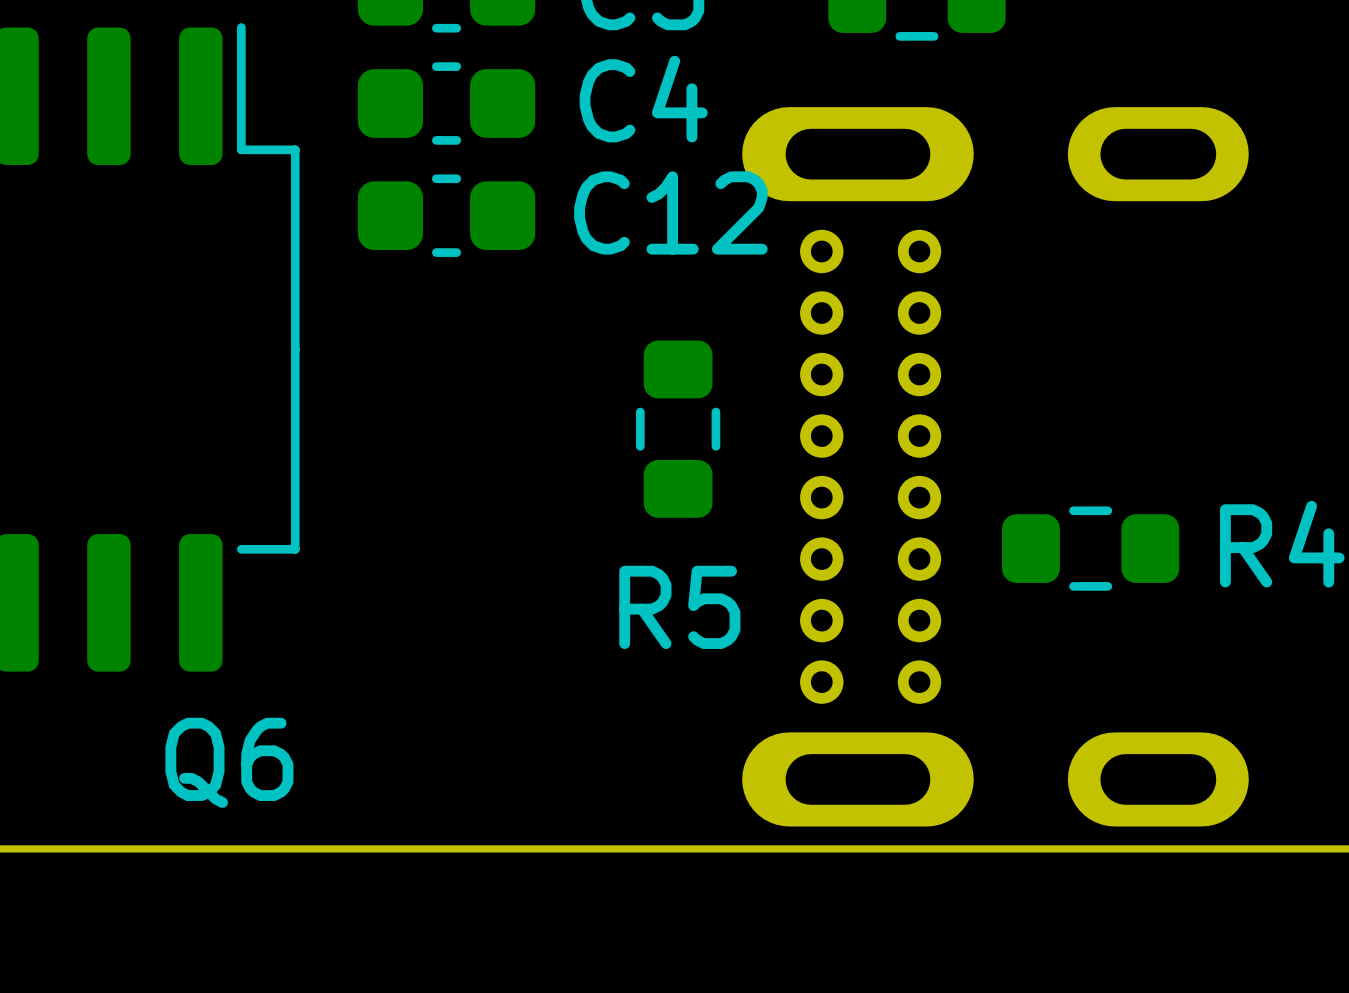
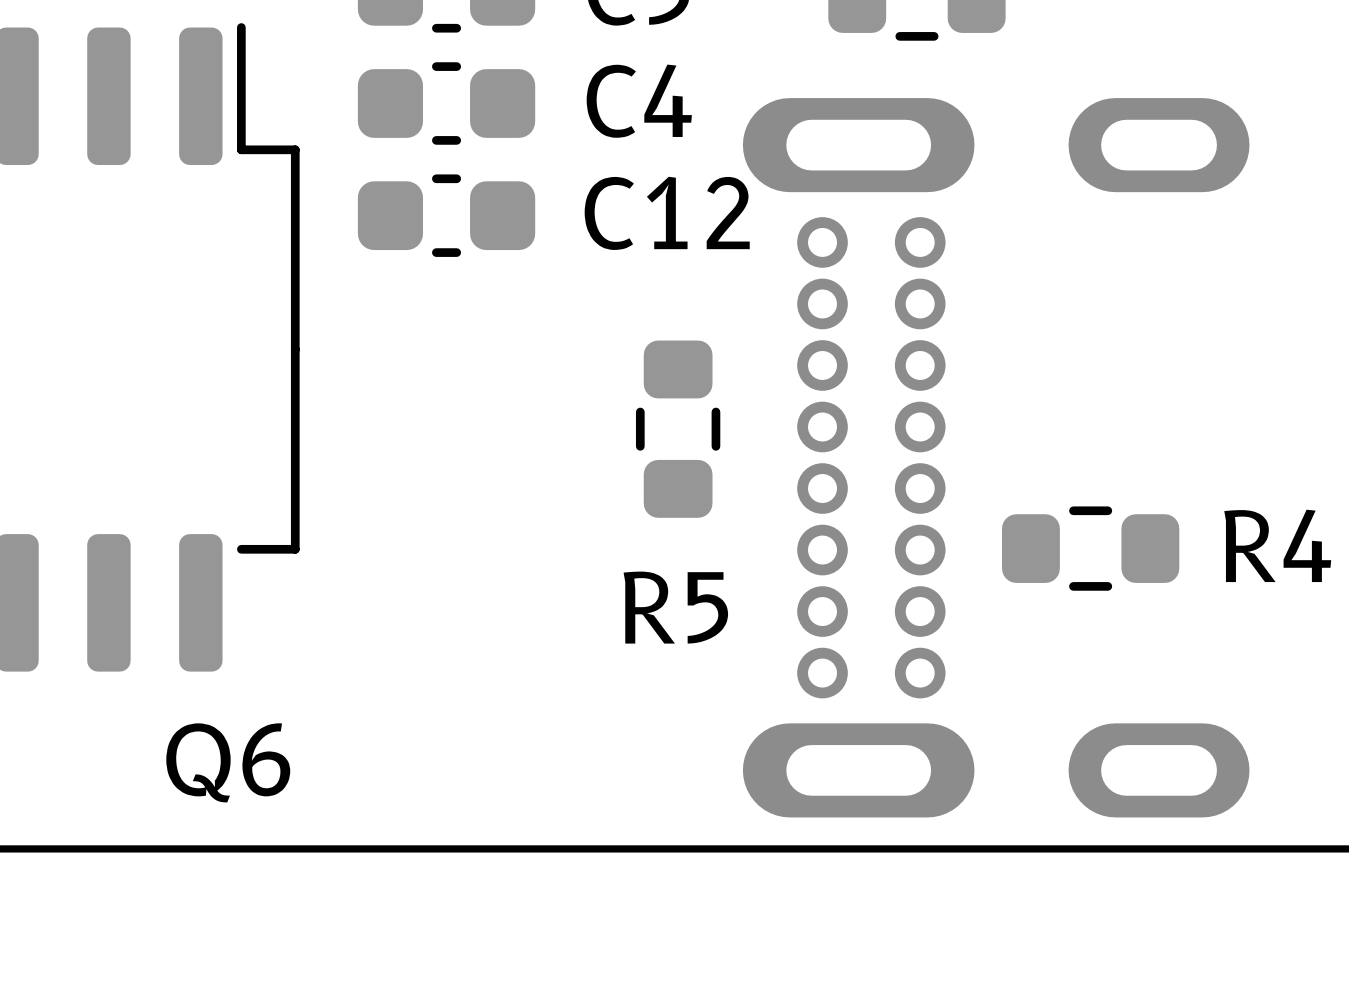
part footprint: [742, 107, 1249, 827] -> [742, 98, 1250, 818]

